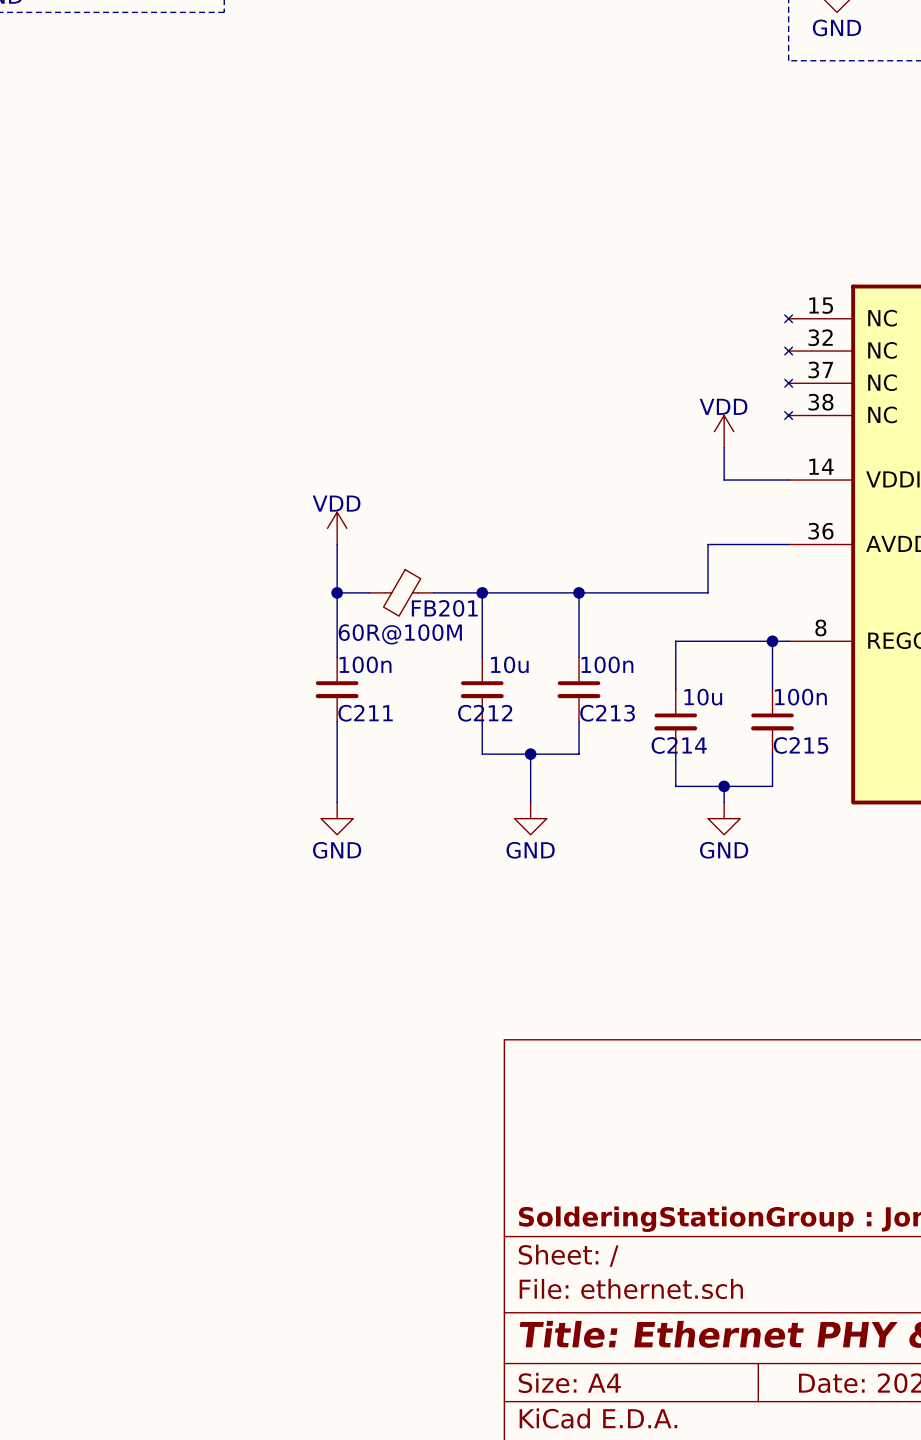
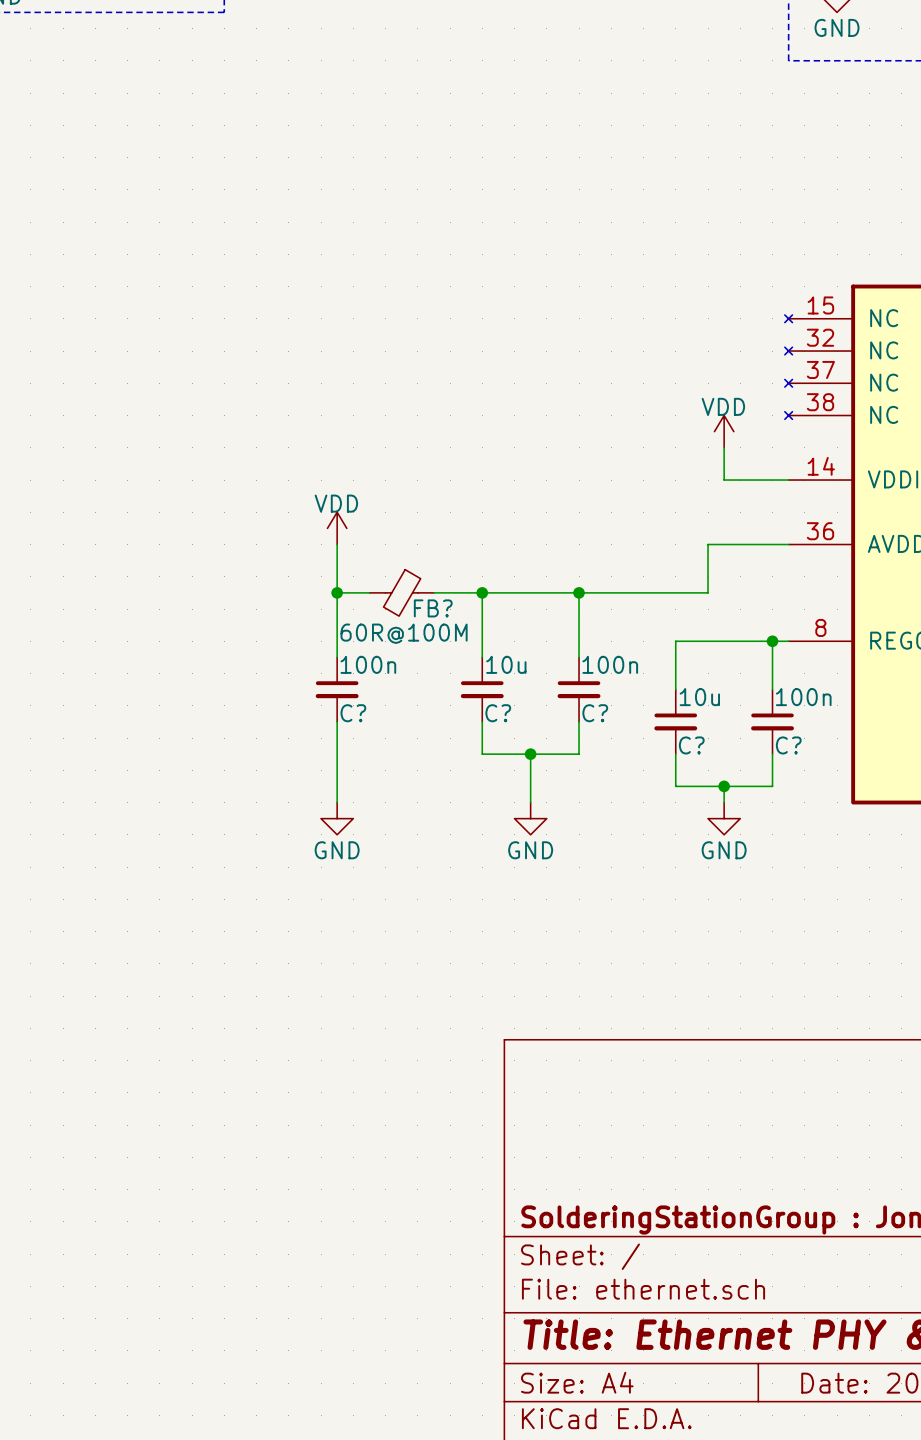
FB201 name: FB201 (444, 608) -> FB? (433, 608)
C211 name: C211 (365, 713) -> C? (353, 713)
C212 name: C212 (485, 713) -> C? (498, 713)
C213 name: C213 (607, 713) -> C? (595, 713)
C214 name: C214 (679, 745) -> C? (691, 745)
C215 name: C215 (800, 745) -> C? (788, 745)

